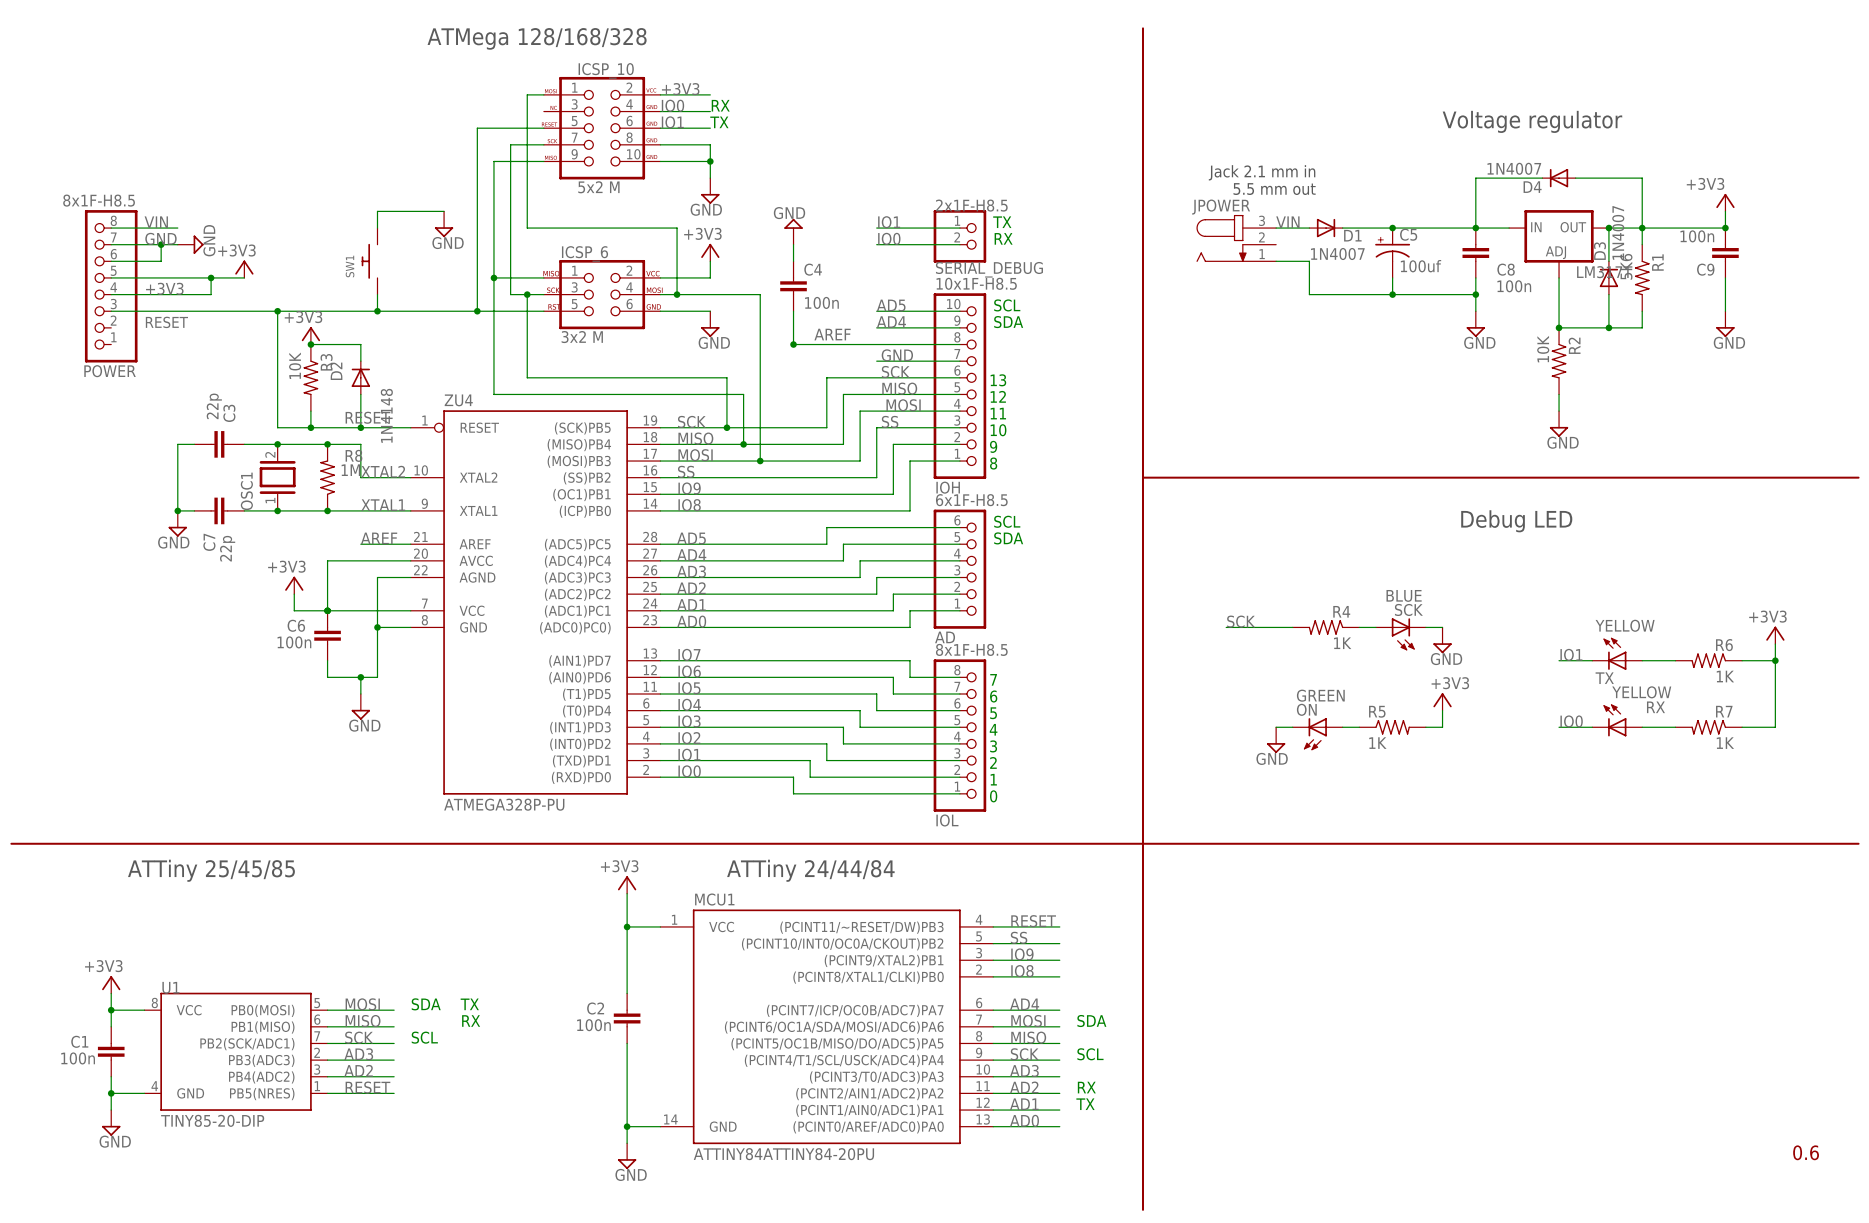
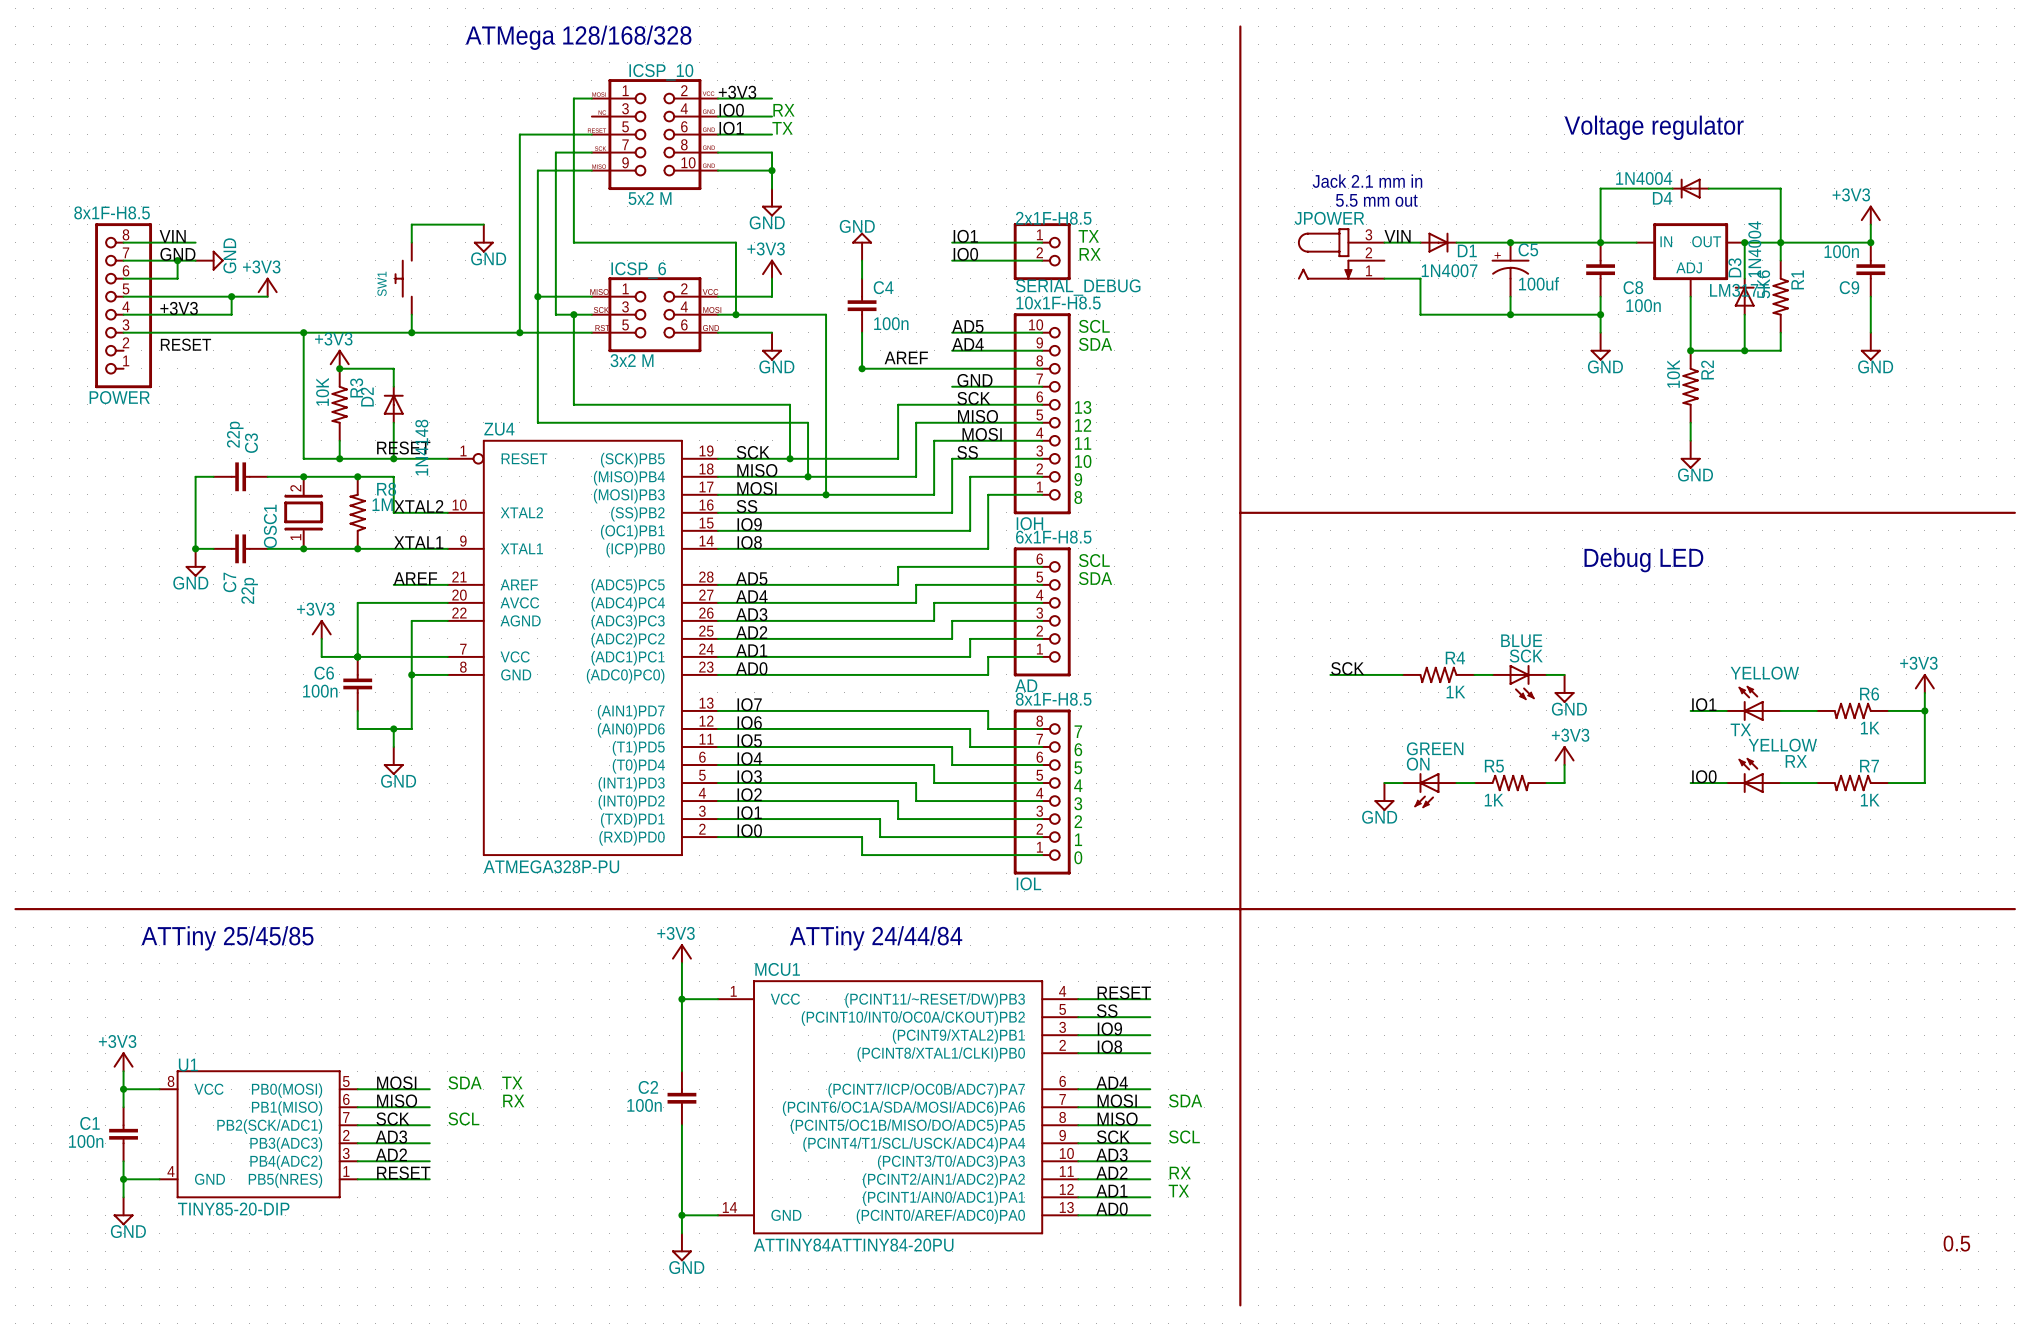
D4 value: 1N4007 (1514, 168) -> 1N4004 (1644, 178)
D3 value: 1N4007 (1618, 232) -> 1N4004 (1754, 249)
text: 0.6 (1806, 1152) -> 0.5 (1956, 1243)

